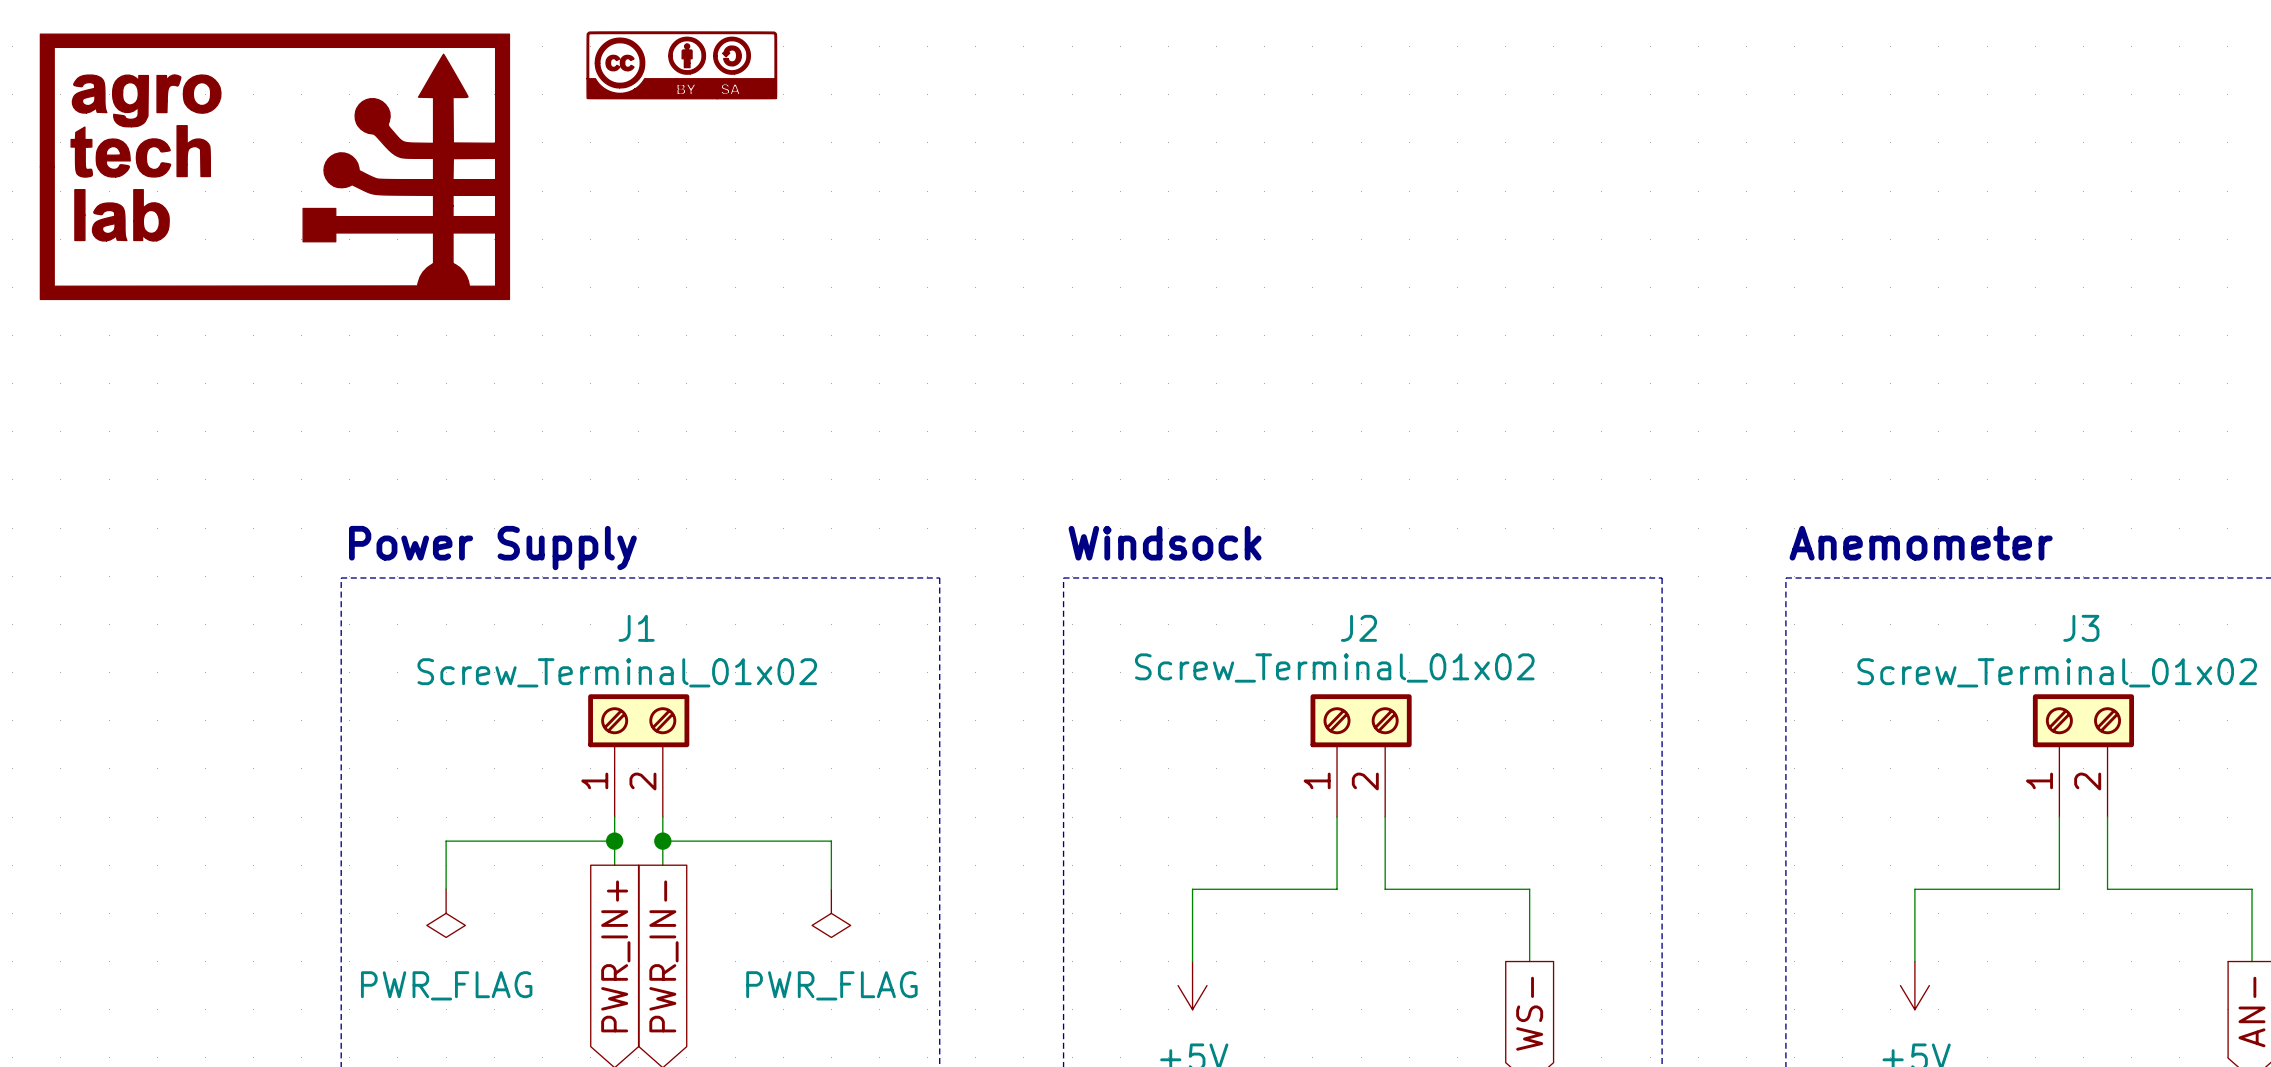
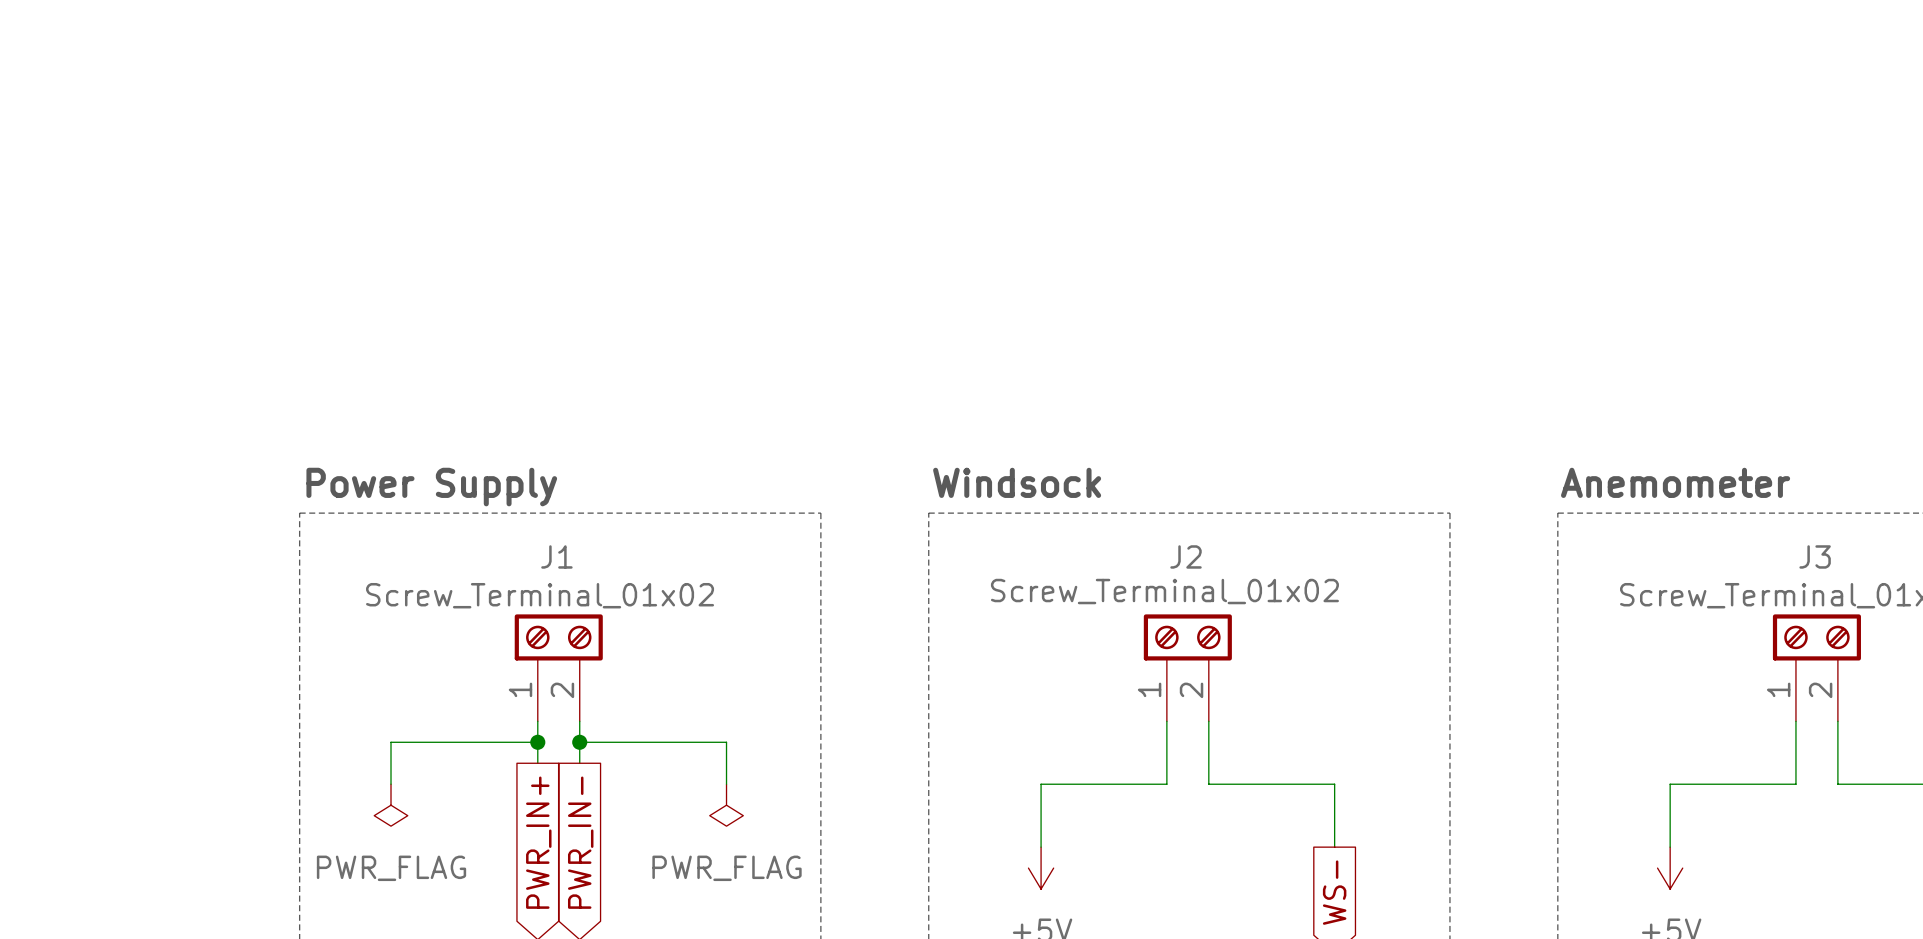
part: (681, 65) -> none
part: (274, 166) -> none

